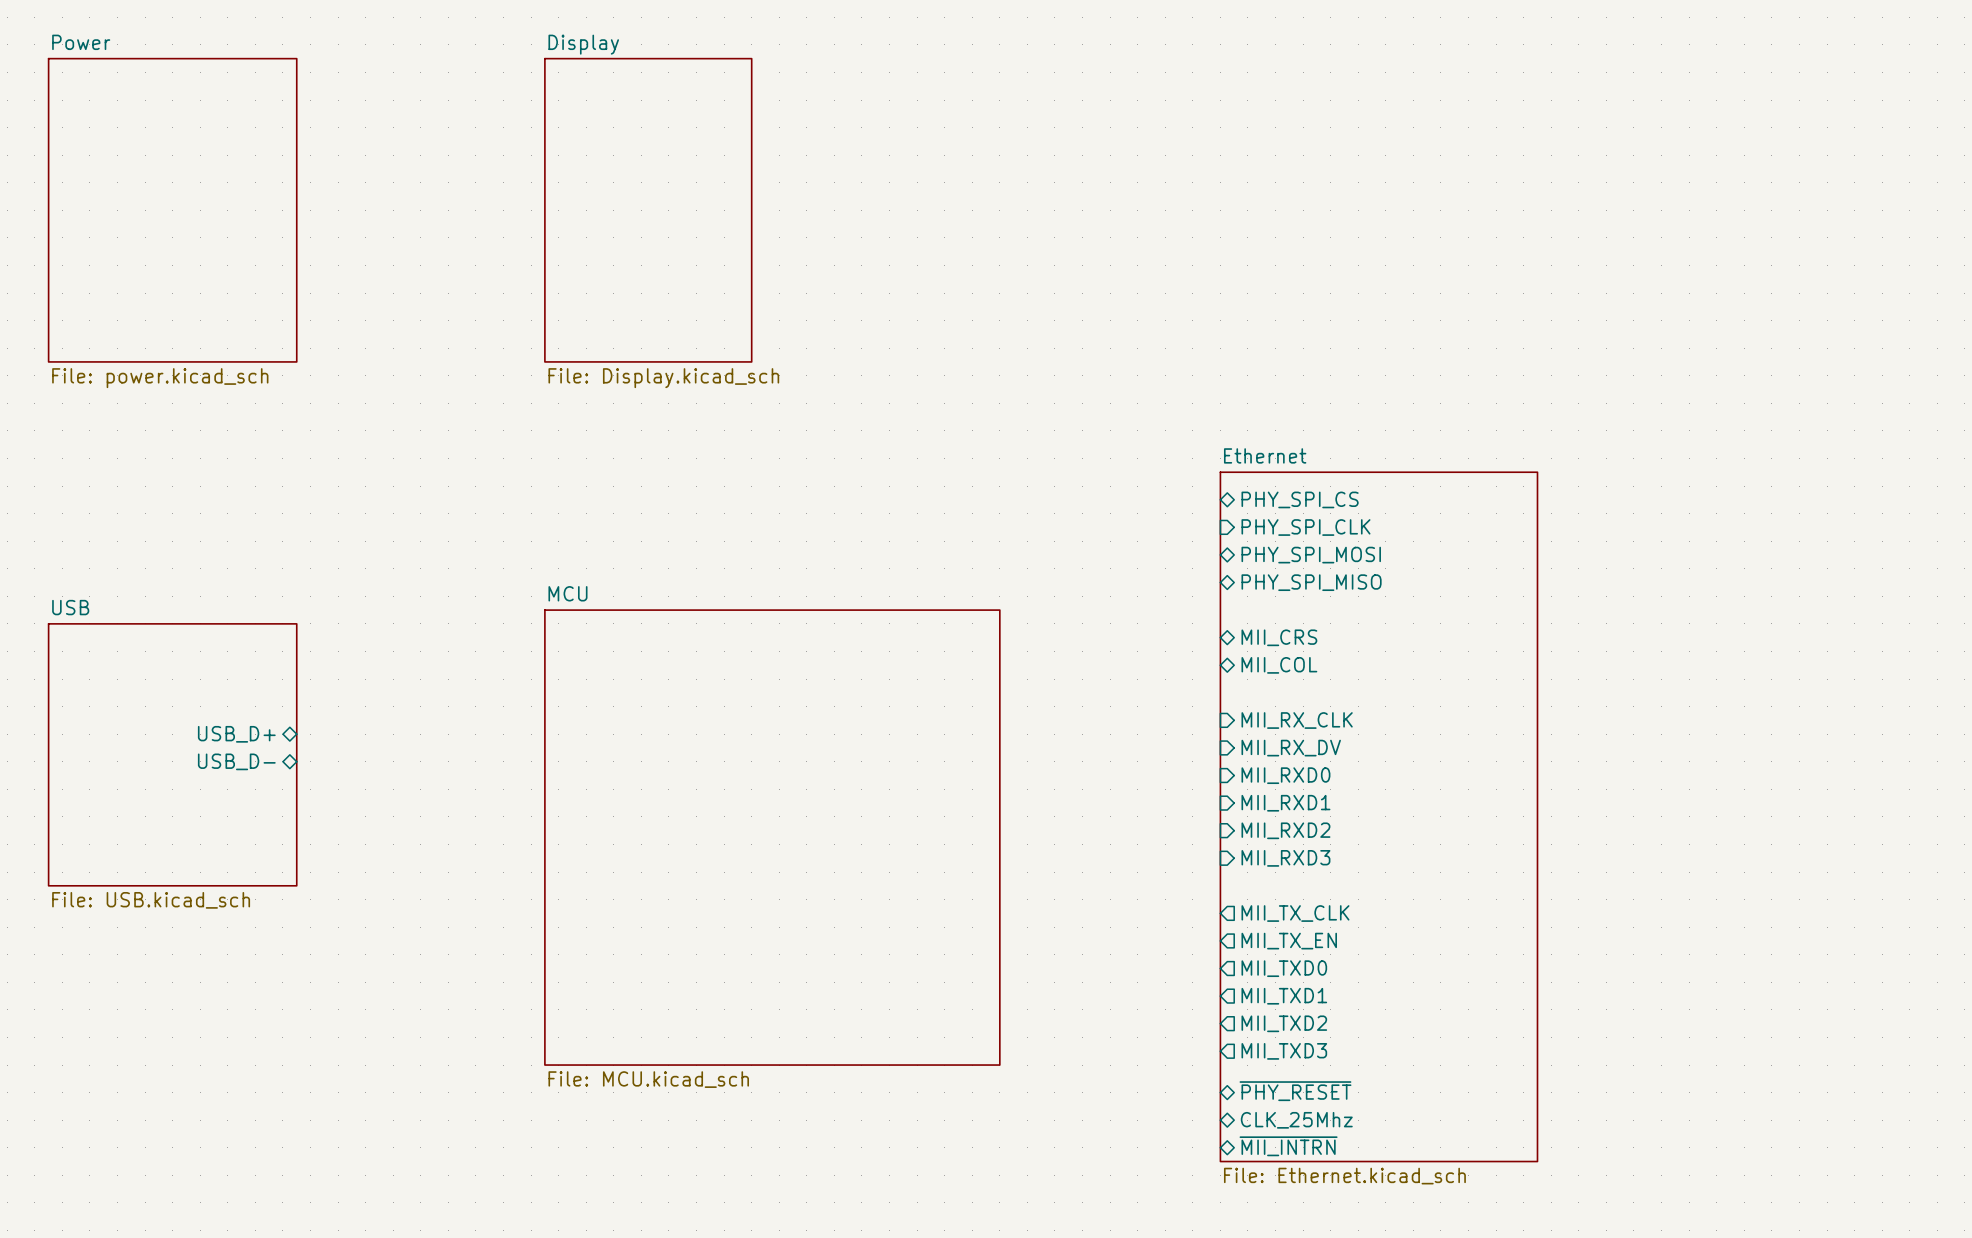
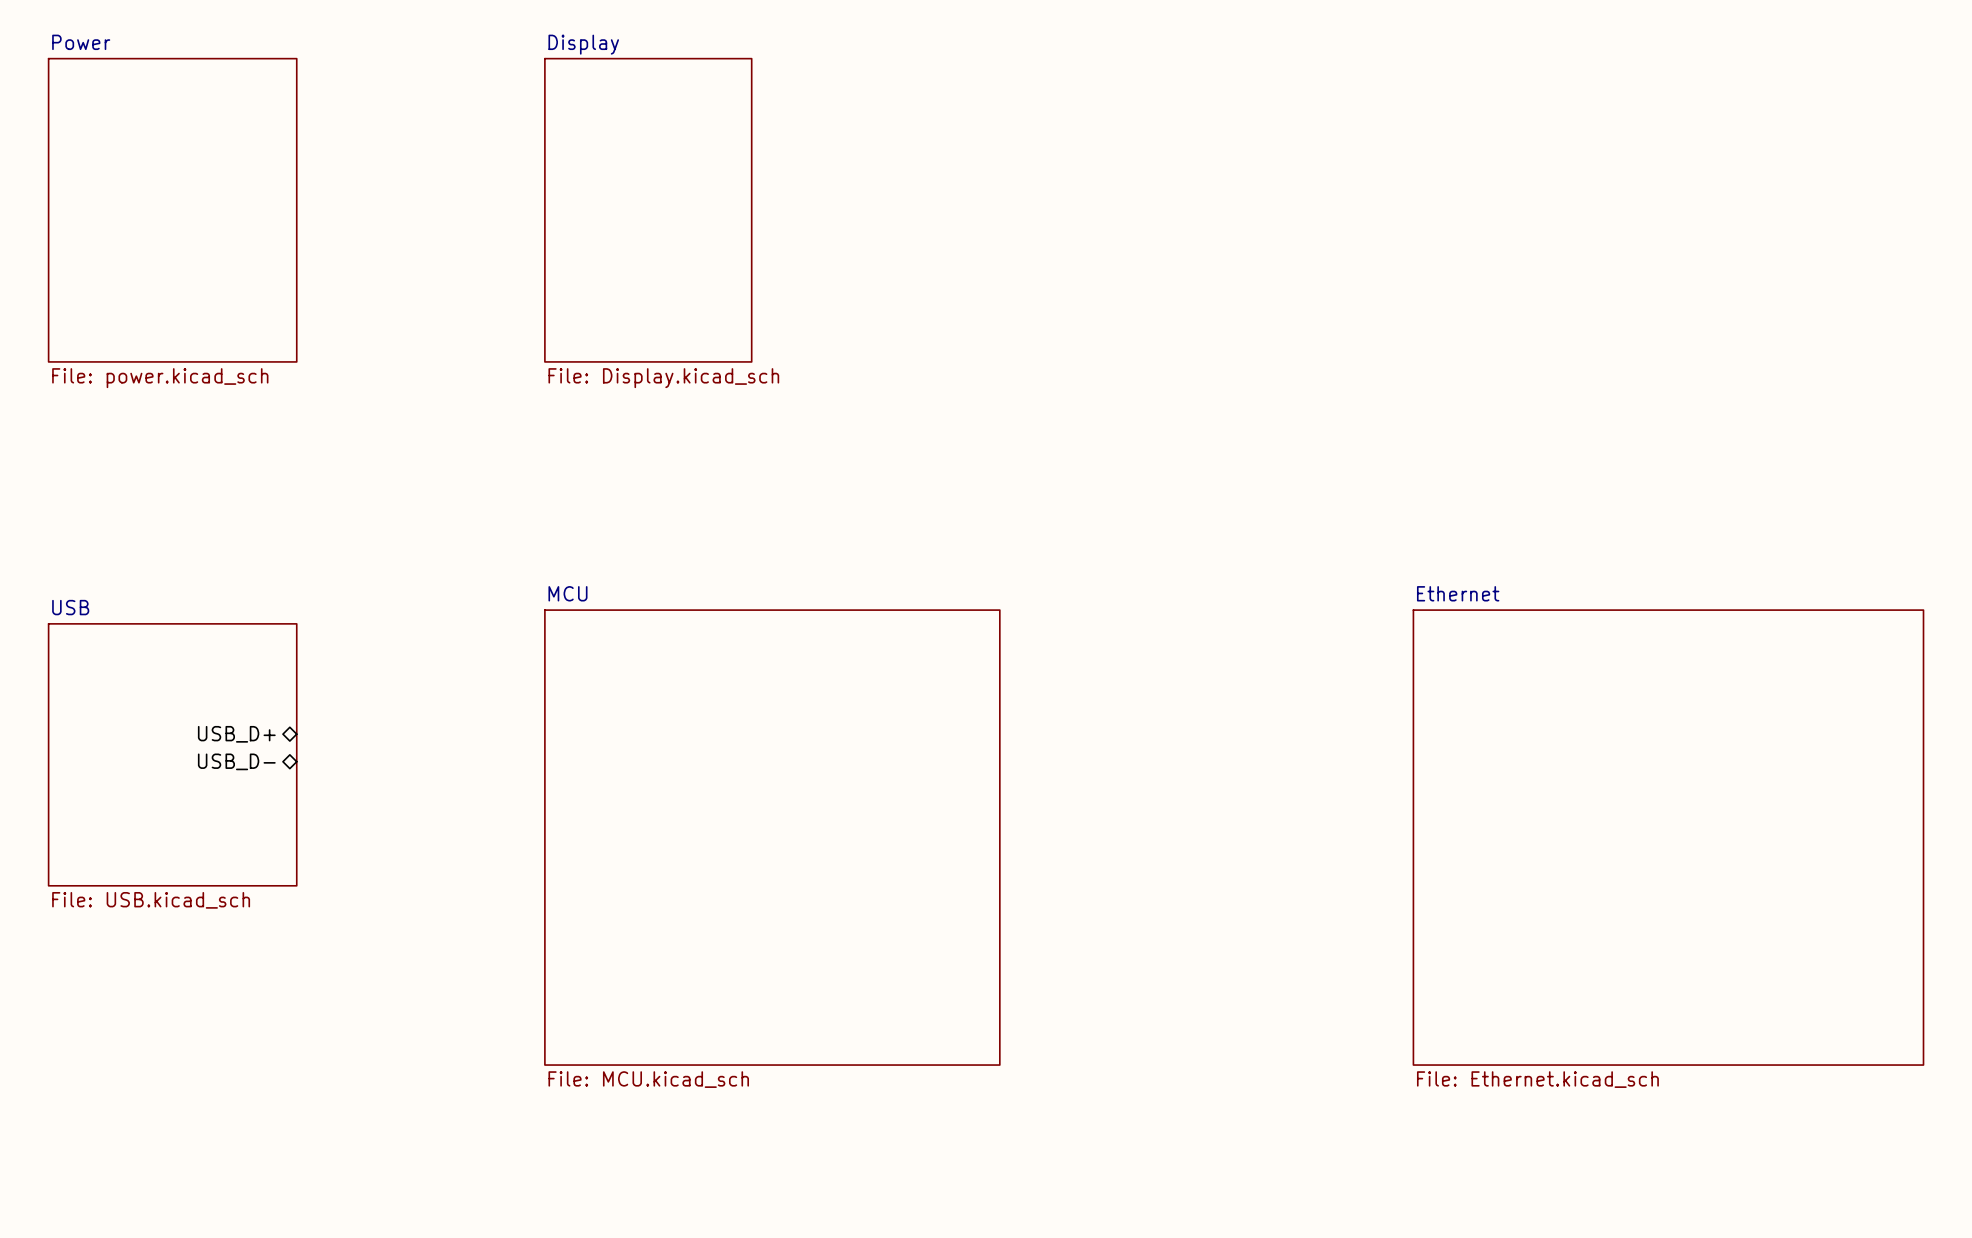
sheet pin: PHY_SPI_CS (1300, 499) -> none
sheet pin: PHY_SPI_CLK (1305, 527) -> none
sheet pin: PHY_SPI_MOSI (1311, 555) -> none
sheet pin: PHY_SPI_MISO (1311, 582) -> none
sheet pin: MII_CRS (1279, 637) -> none
sheet pin: MII_COL (1279, 665) -> none
sheet pin: MII_RX_CLK (1297, 720) -> none
sheet pin: MII_RX_DV (1291, 748) -> none
sheet pin: MII_RXD0 (1285, 775) -> none
sheet pin: MII_RXD1 (1285, 803) -> none
sheet Ethernet: File: Ethernet.kicad_sch (1378, 816) -> none
sheet pin: MII_RXD2 (1285, 830) -> none
sheet Ethernet: none -> File: Ethernet.kicad_sch (1668, 837)
sheet pin: MII_RXD3 (1285, 858) -> none
sheet pin: MII_TX_CLK (1295, 913) -> none
sheet pin: MII_TX_EN (1289, 941) -> none
sheet pin: MII_TXD0 (1284, 968) -> none
sheet pin: MII_TXD1 (1284, 996) -> none
sheet pin: MII_TXD2 (1284, 1023) -> none
sheet pin: MII_TXD3 (1284, 1051) -> none
sheet pin: ~{PHY_RESET} (1295, 1091) -> none
sheet pin: CLK_25Mhz (1296, 1120) -> none
sheet pin: ~{MII_INTRN} (1288, 1146) -> none

